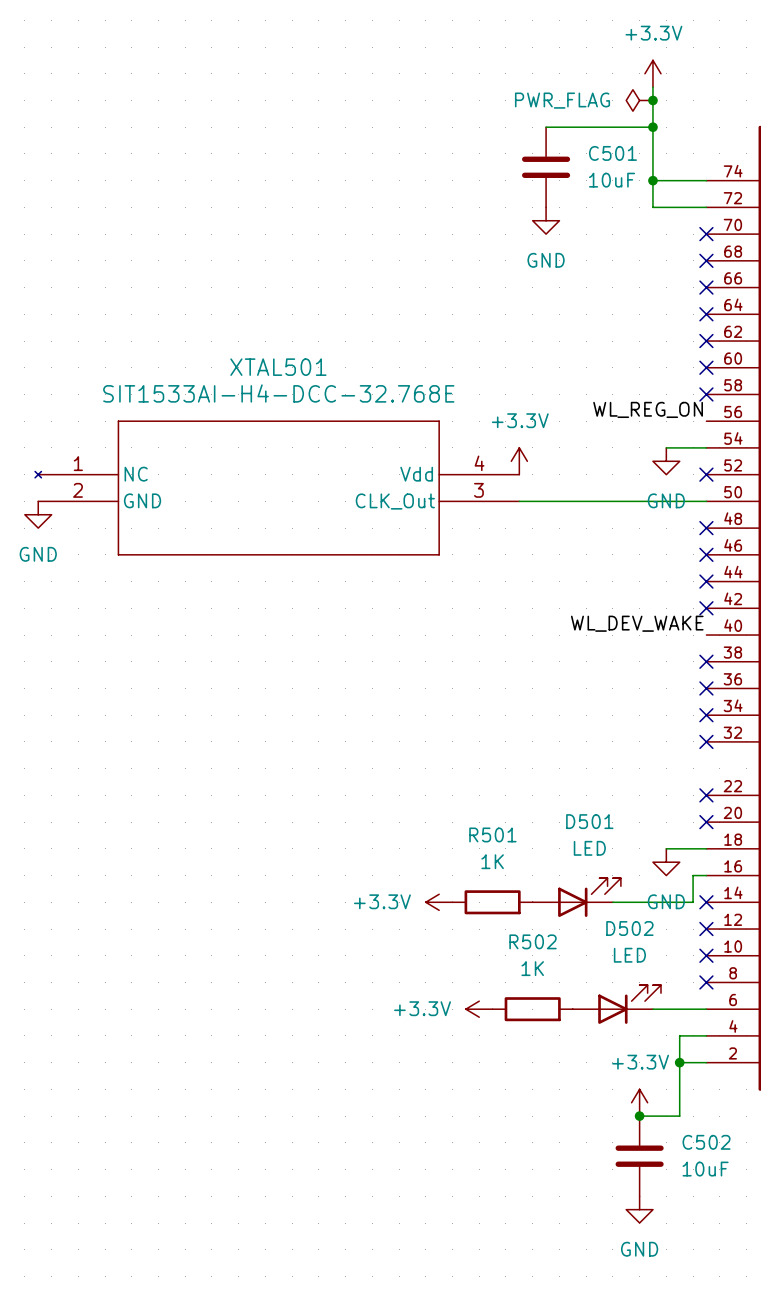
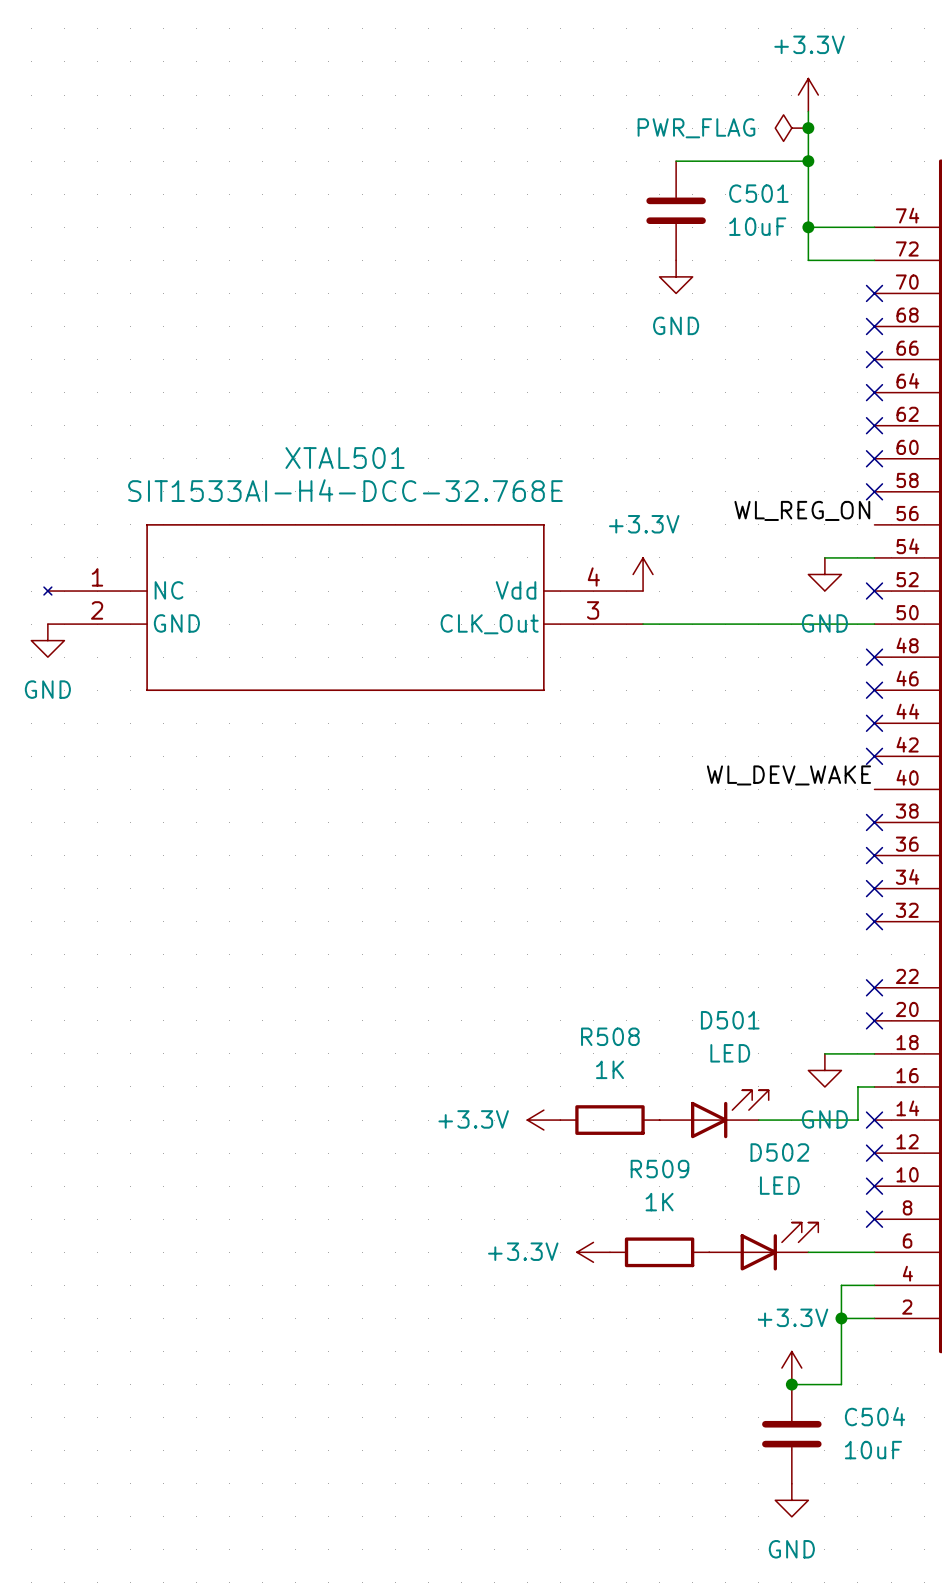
R501 name: R501 (492, 834) -> R508 (610, 1036)
R502 name: R502 (533, 941) -> R509 (659, 1169)
C502 name: C502 (706, 1142) -> C504 (875, 1416)

